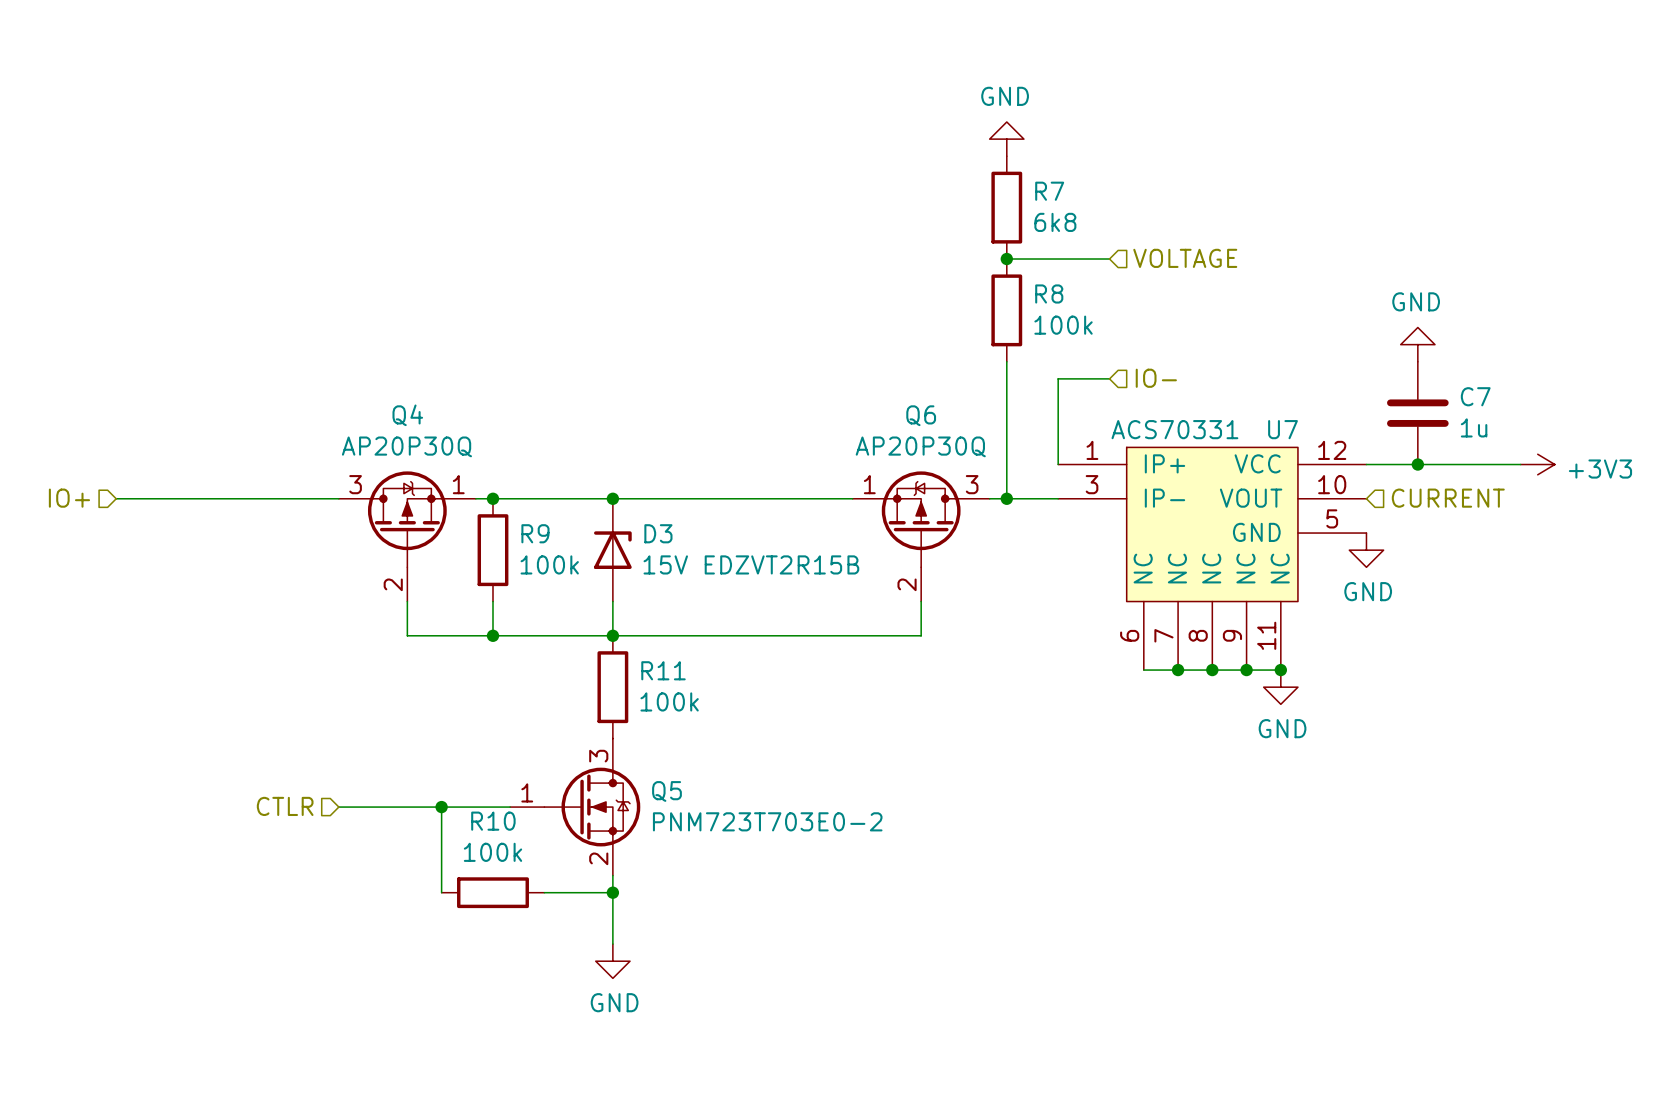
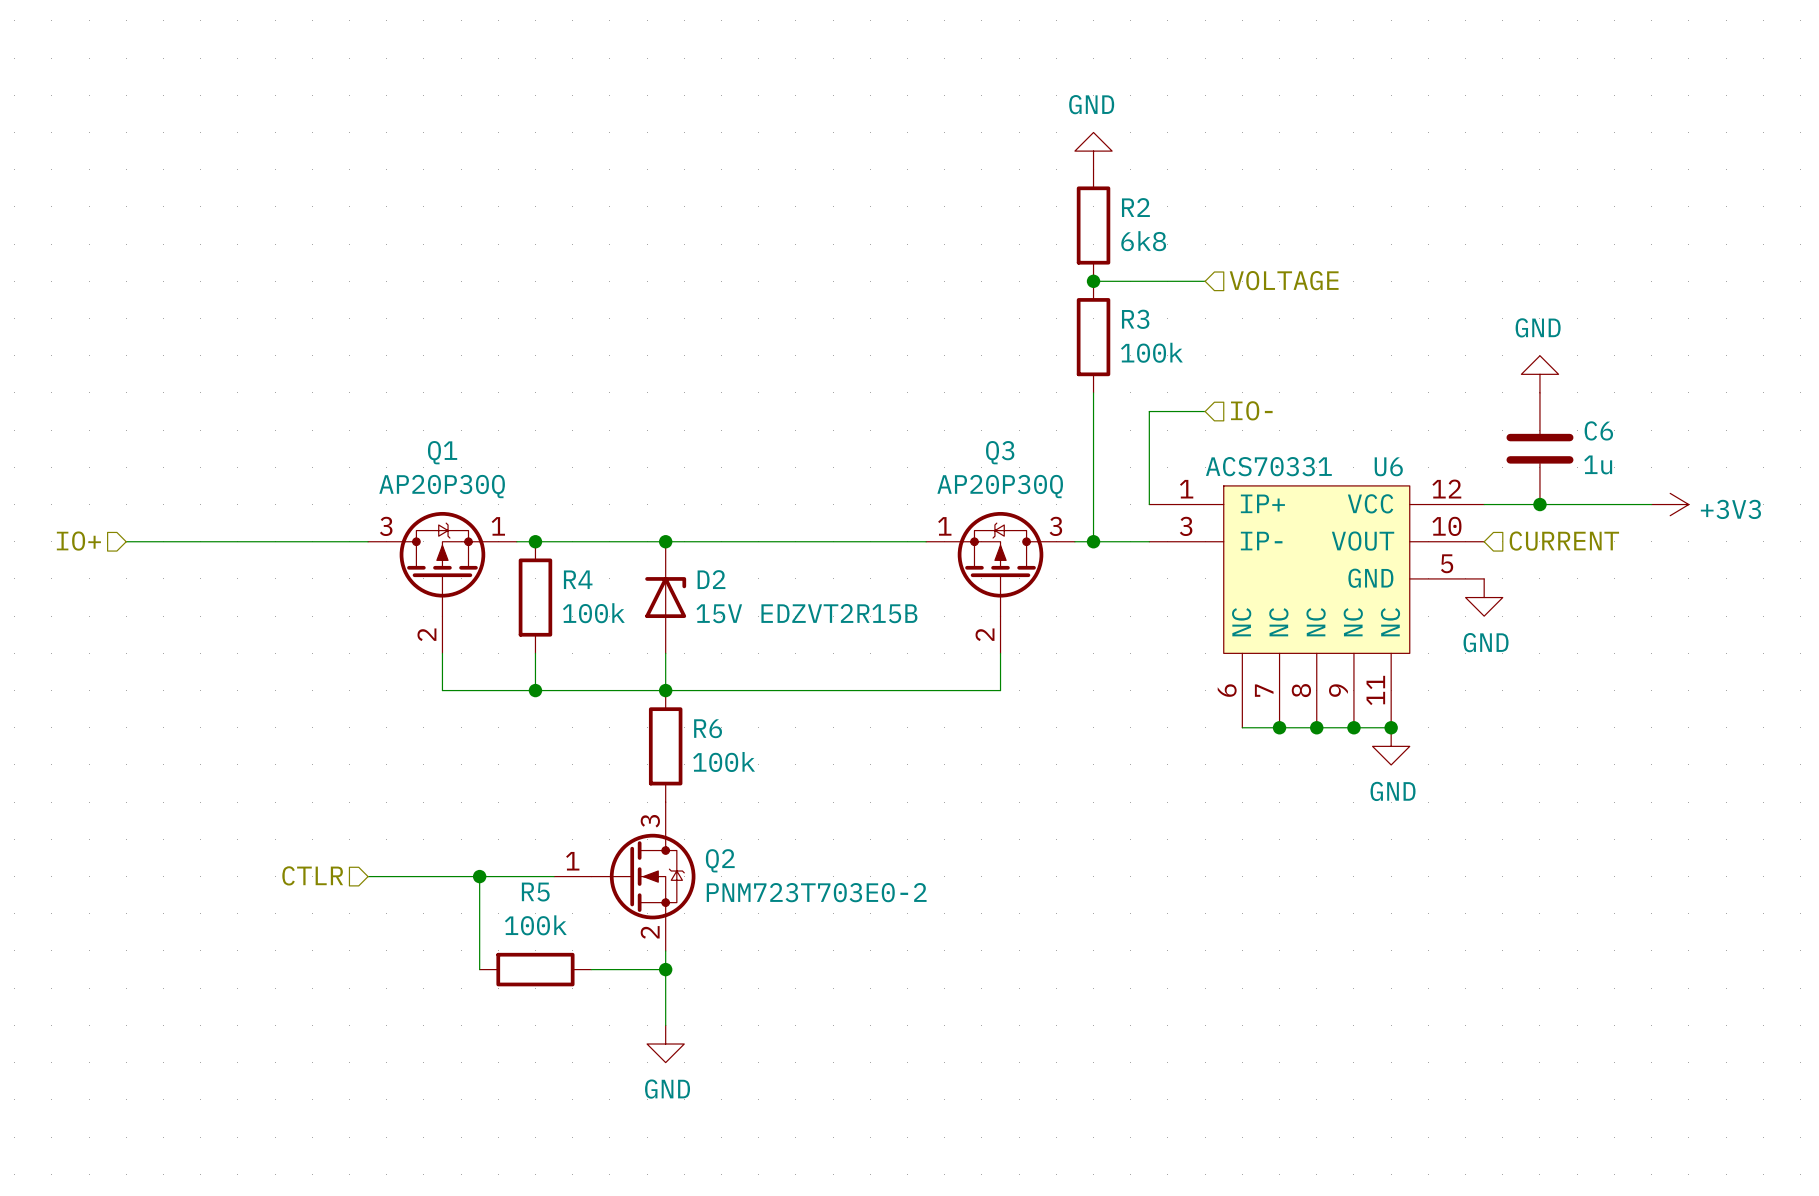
R7 name: R7 (1049, 191) -> R2 (1135, 207)
R8 name: R8 (1049, 293) -> R3 (1135, 319)
C7 name: C7 (1475, 396) -> C6 (1598, 430)
Q4 name: Q4 (407, 415) -> Q1 (442, 452)
Q6 name: Q6 (921, 415) -> Q3 (1000, 452)
U7 name: U7 (1283, 429) -> U6 (1388, 466)
R9 name: R9 (535, 533) -> R4 (578, 579)
D3 name: D3 (658, 533) -> D2 (711, 579)
R11 name: R11 (663, 670) -> R6 (708, 728)
Q5 name: Q5 (666, 791) -> Q2 (720, 860)
R10 name: R10 (493, 821) -> R5 (535, 892)

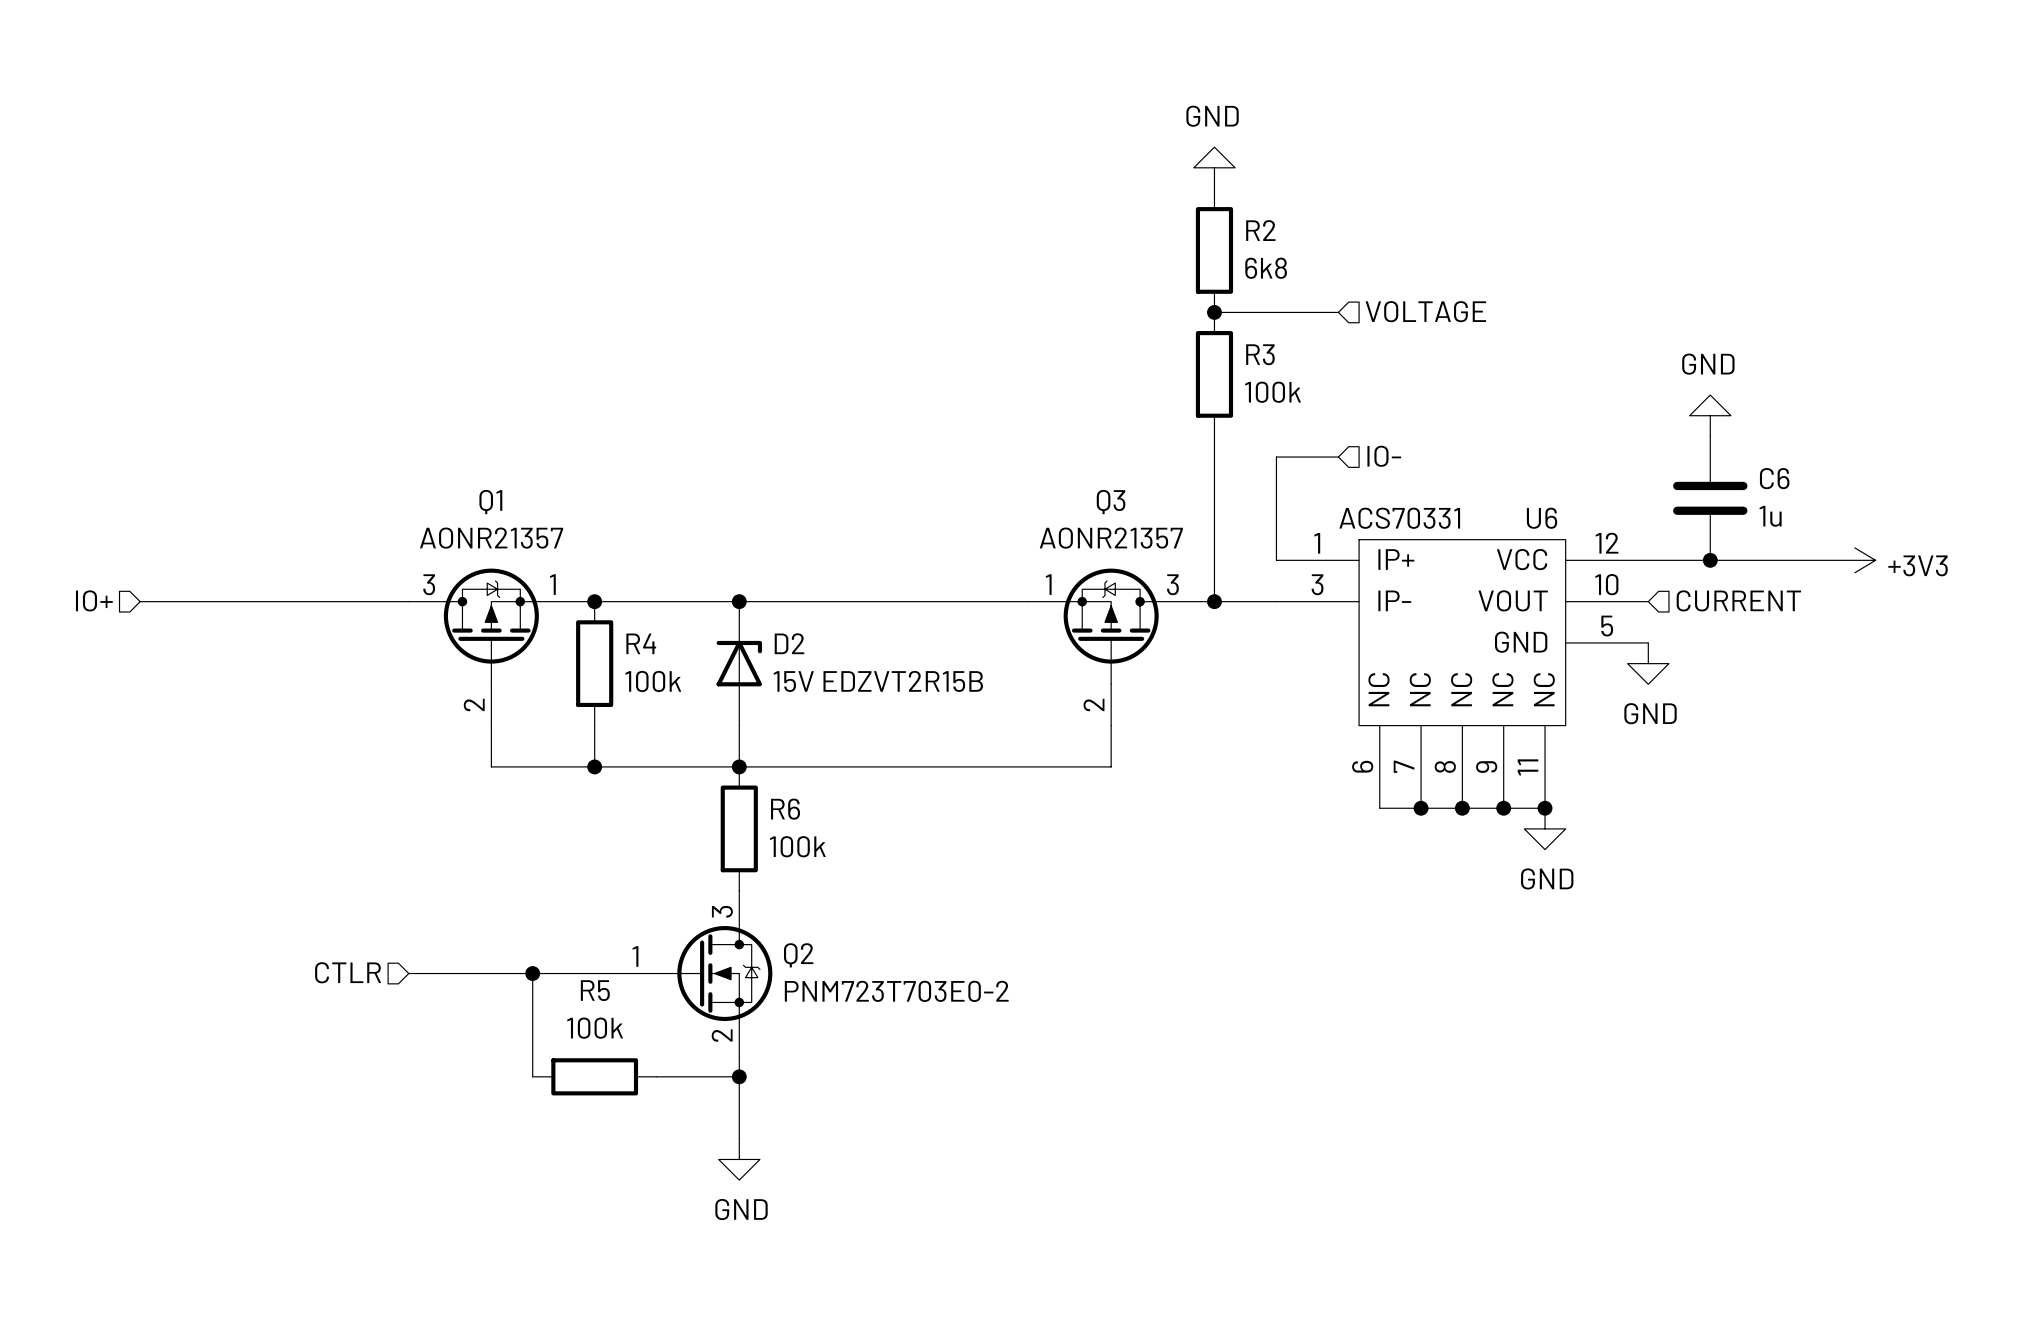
Q1 value: AP20P30Q (442, 486) -> AONR21357 (491, 538)
Q3 value: AP20P30Q (1000, 486) -> AONR21357 (1111, 538)

